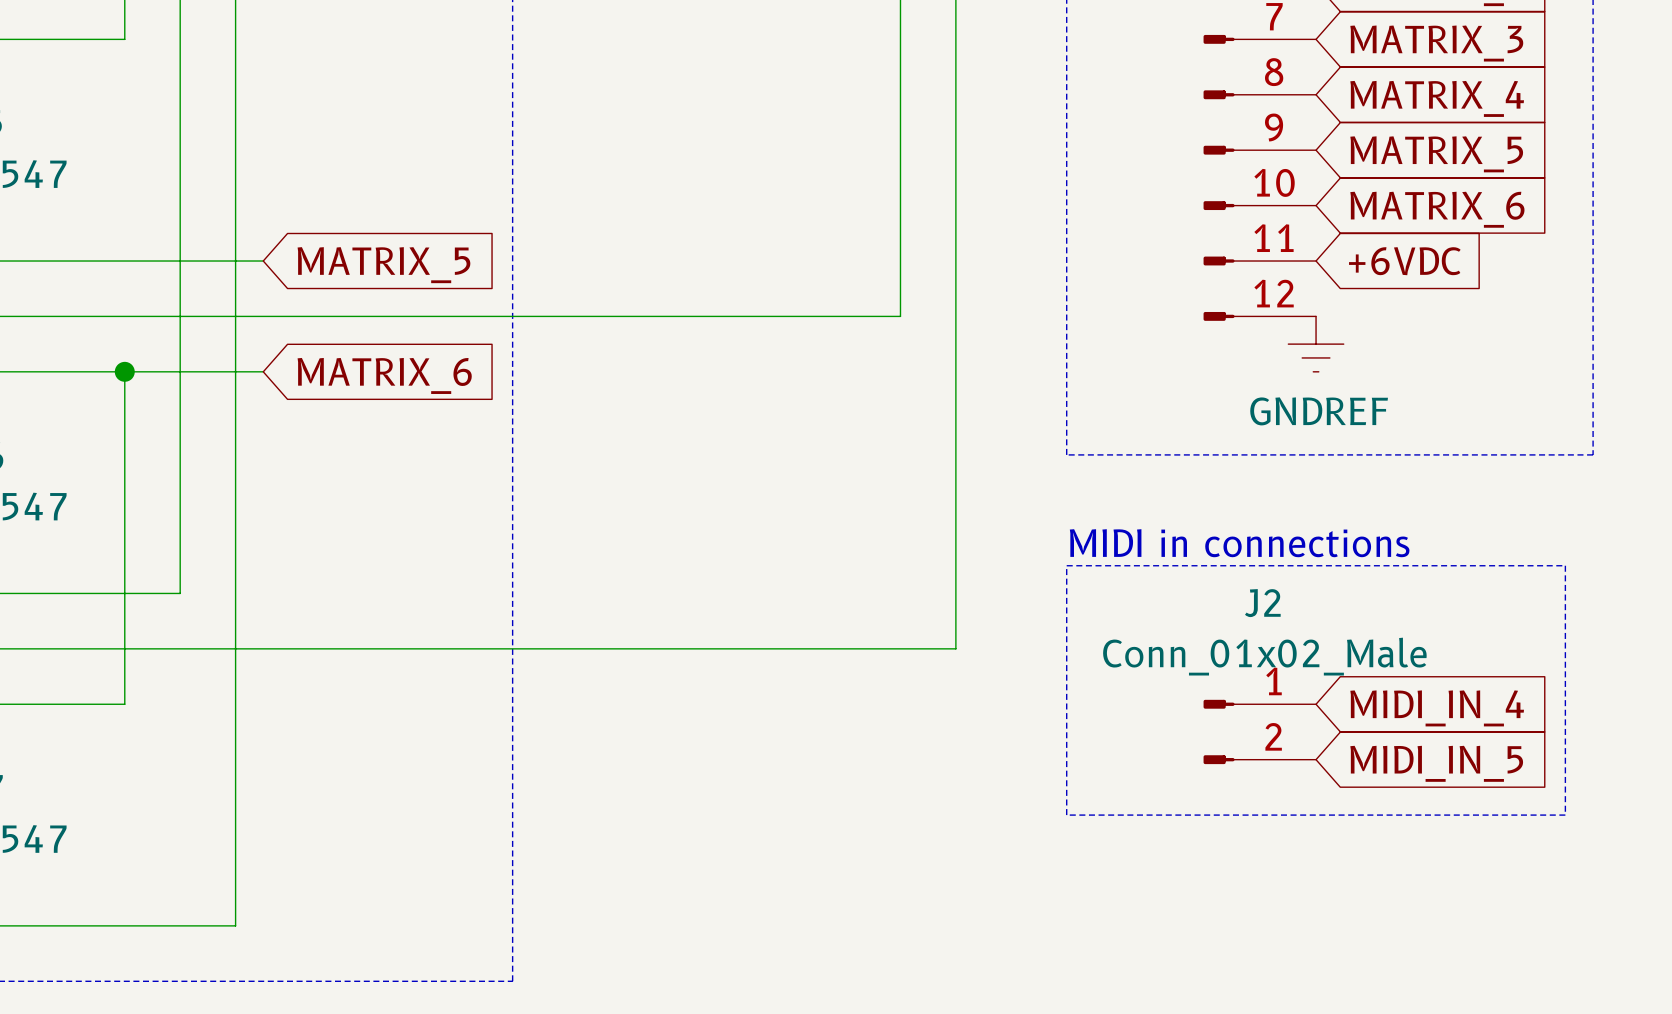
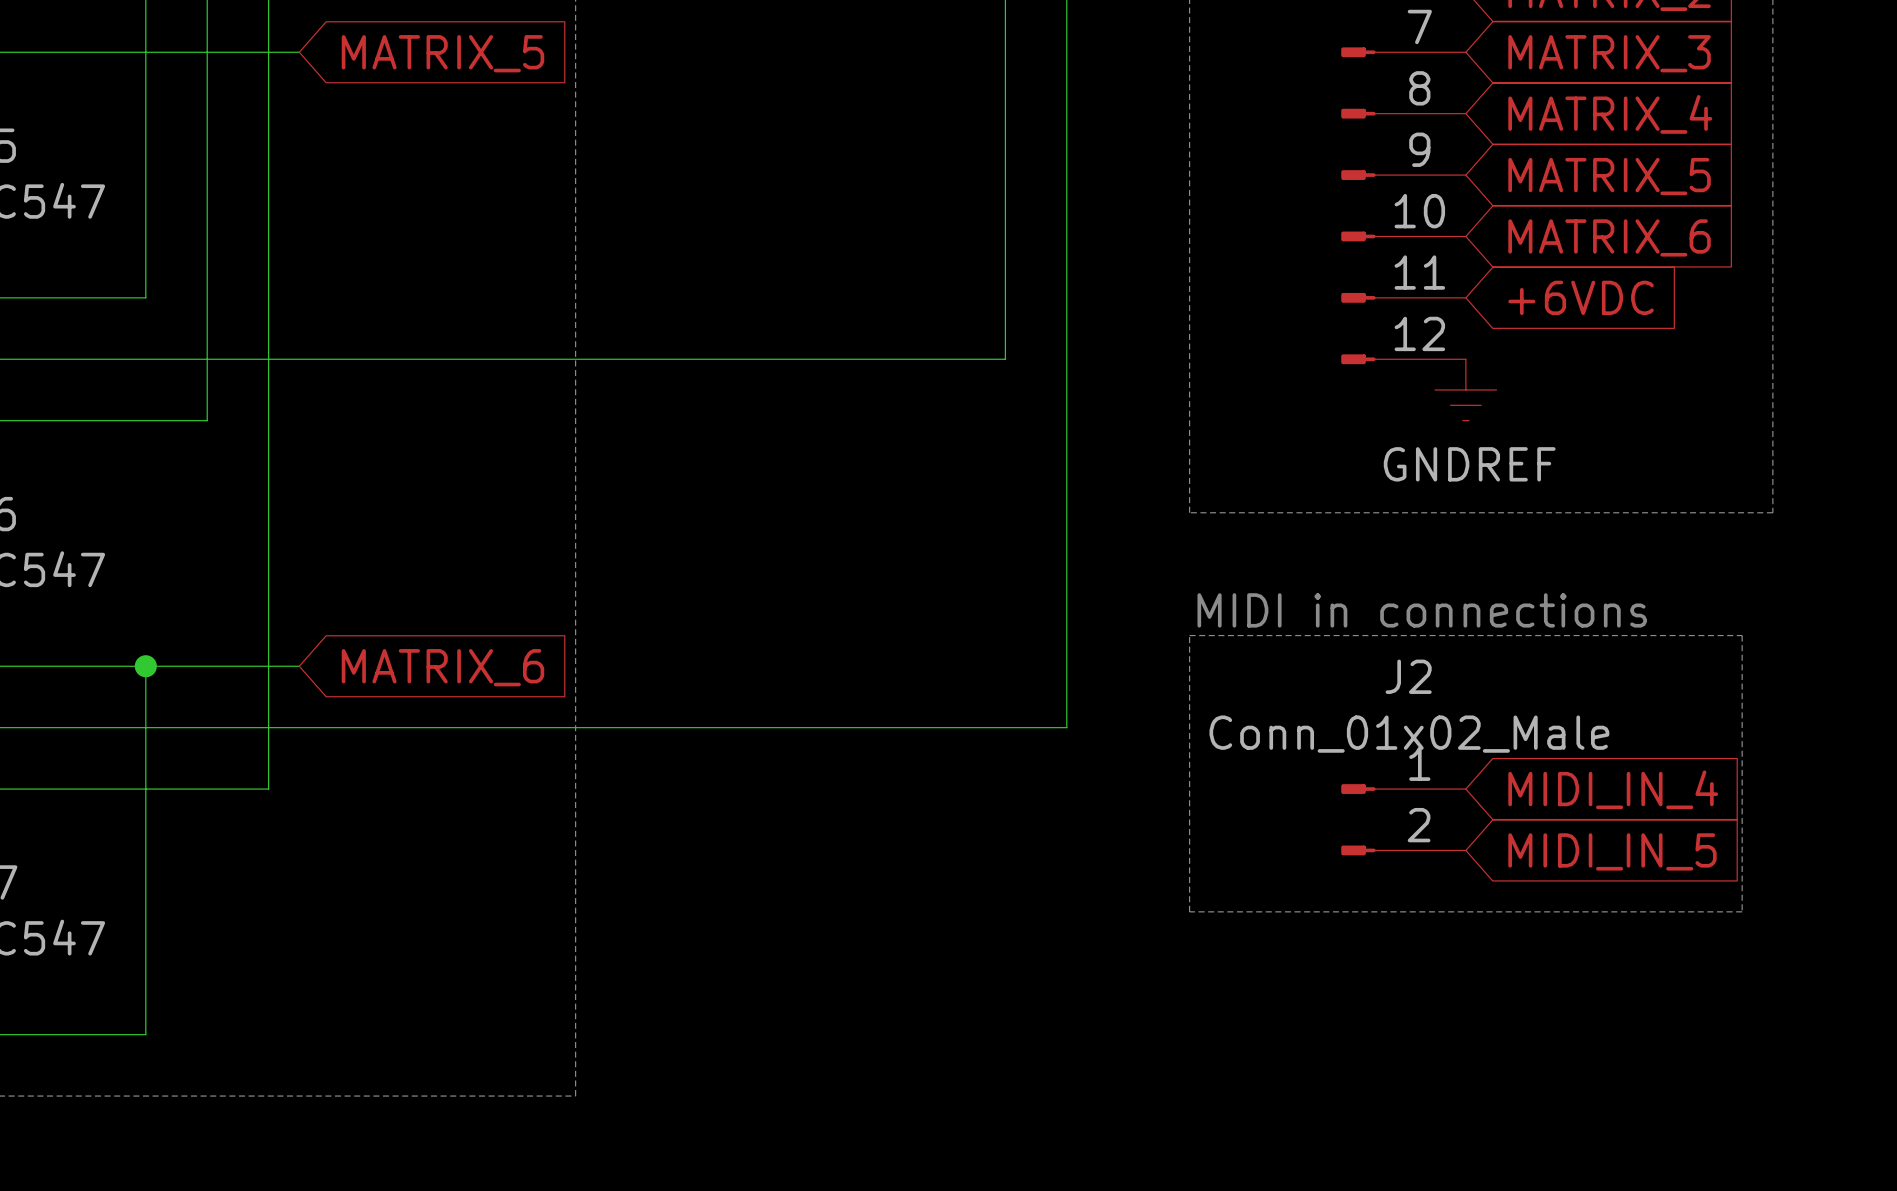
wire: (124, 261) (263, 261) -> (145, 297) (145, 52) (299, 52)
global label position: MATRIX_5 (383, 265) -> MATRIX_5 (442, 53)
wire: (124, 371) (124, 593) -> none
junction: (124, 371) -> none
wire: (263, 371) (180, 371) (180, 593) -> (299, 666) (207, 666)
global label position: MATRIX_6 (384, 375) -> MATRIX_6 (442, 667)
junction: none -> (145, 666)
wire: (235, 704) (235, 925) (124, 925) -> (268, 789) (145, 789) (145, 1034)

